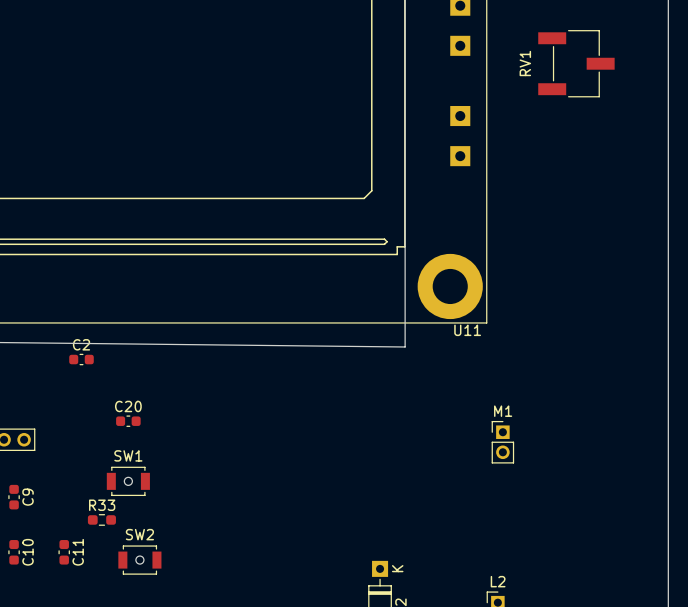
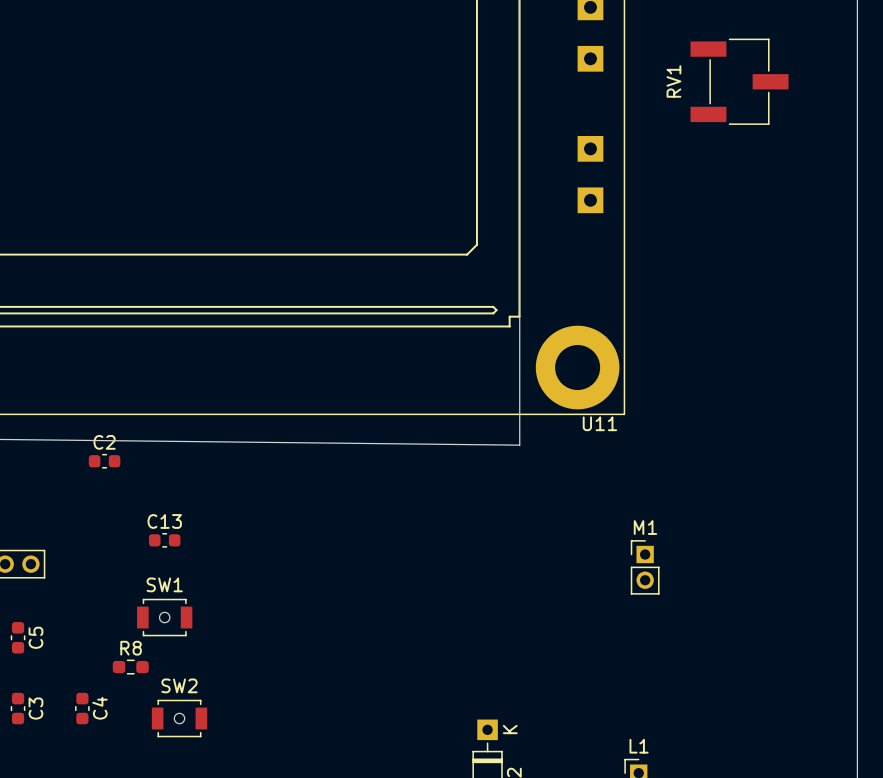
C20 name: C20 (128, 406) -> C13 (164, 521)
C9 name: C9 (28, 497) -> C5 (35, 637)
R33 name: R33 (102, 505) -> R8 (131, 648)
C10 name: C10 (28, 552) -> C3 (35, 708)
C11 name: C11 (78, 552) -> C4 (99, 708)
L2 name: L2 (498, 581) -> L1 (639, 746)

